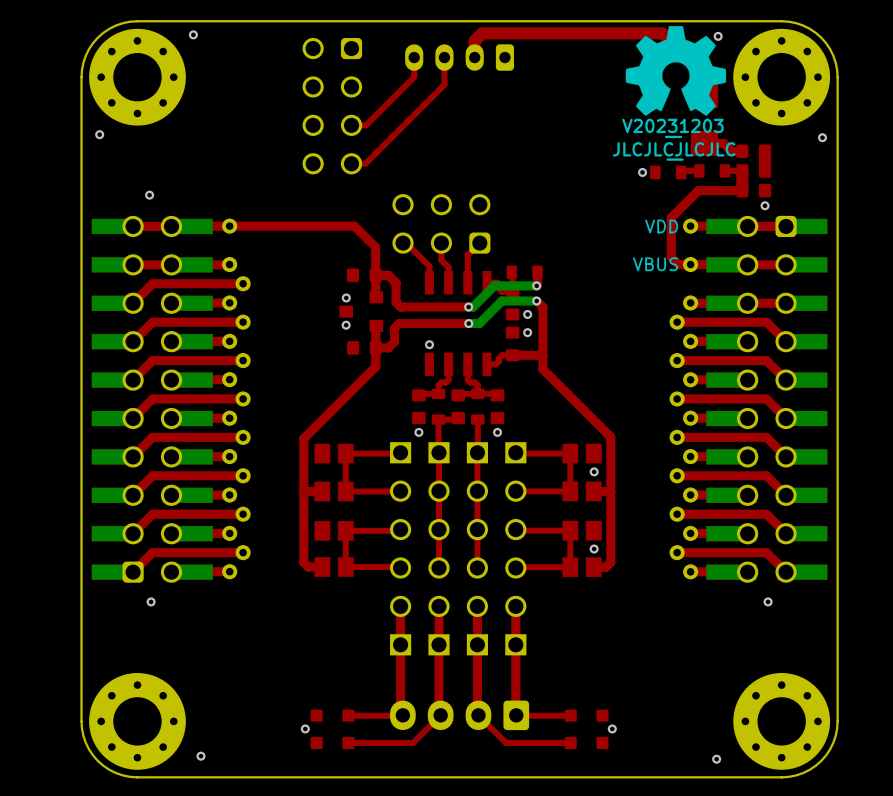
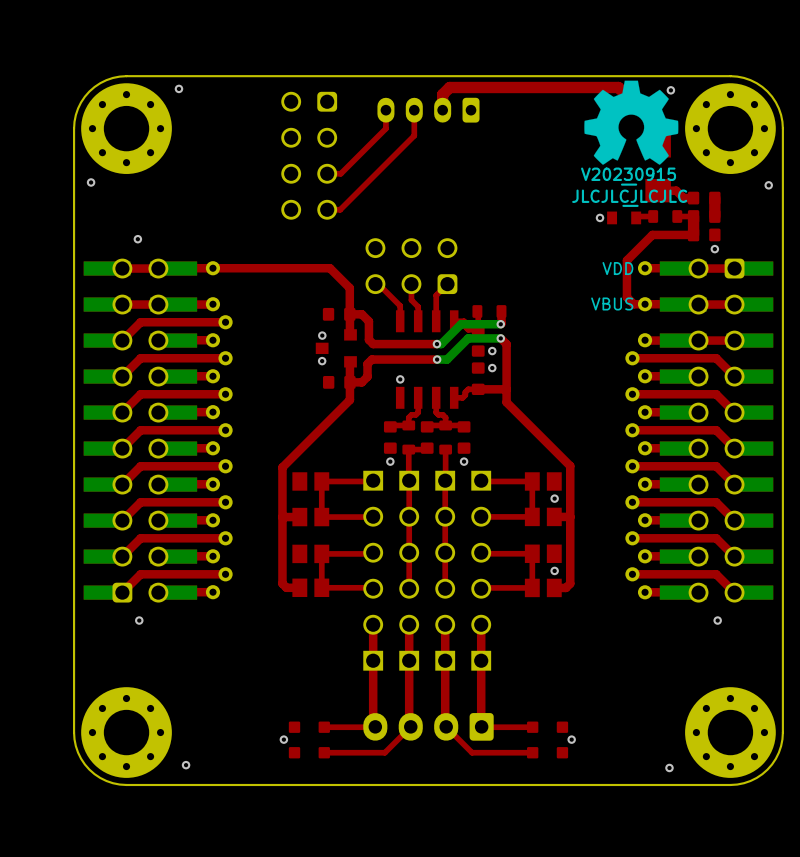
drawing shape: [622, 118, 724, 139] -> [581, 167, 677, 186]

